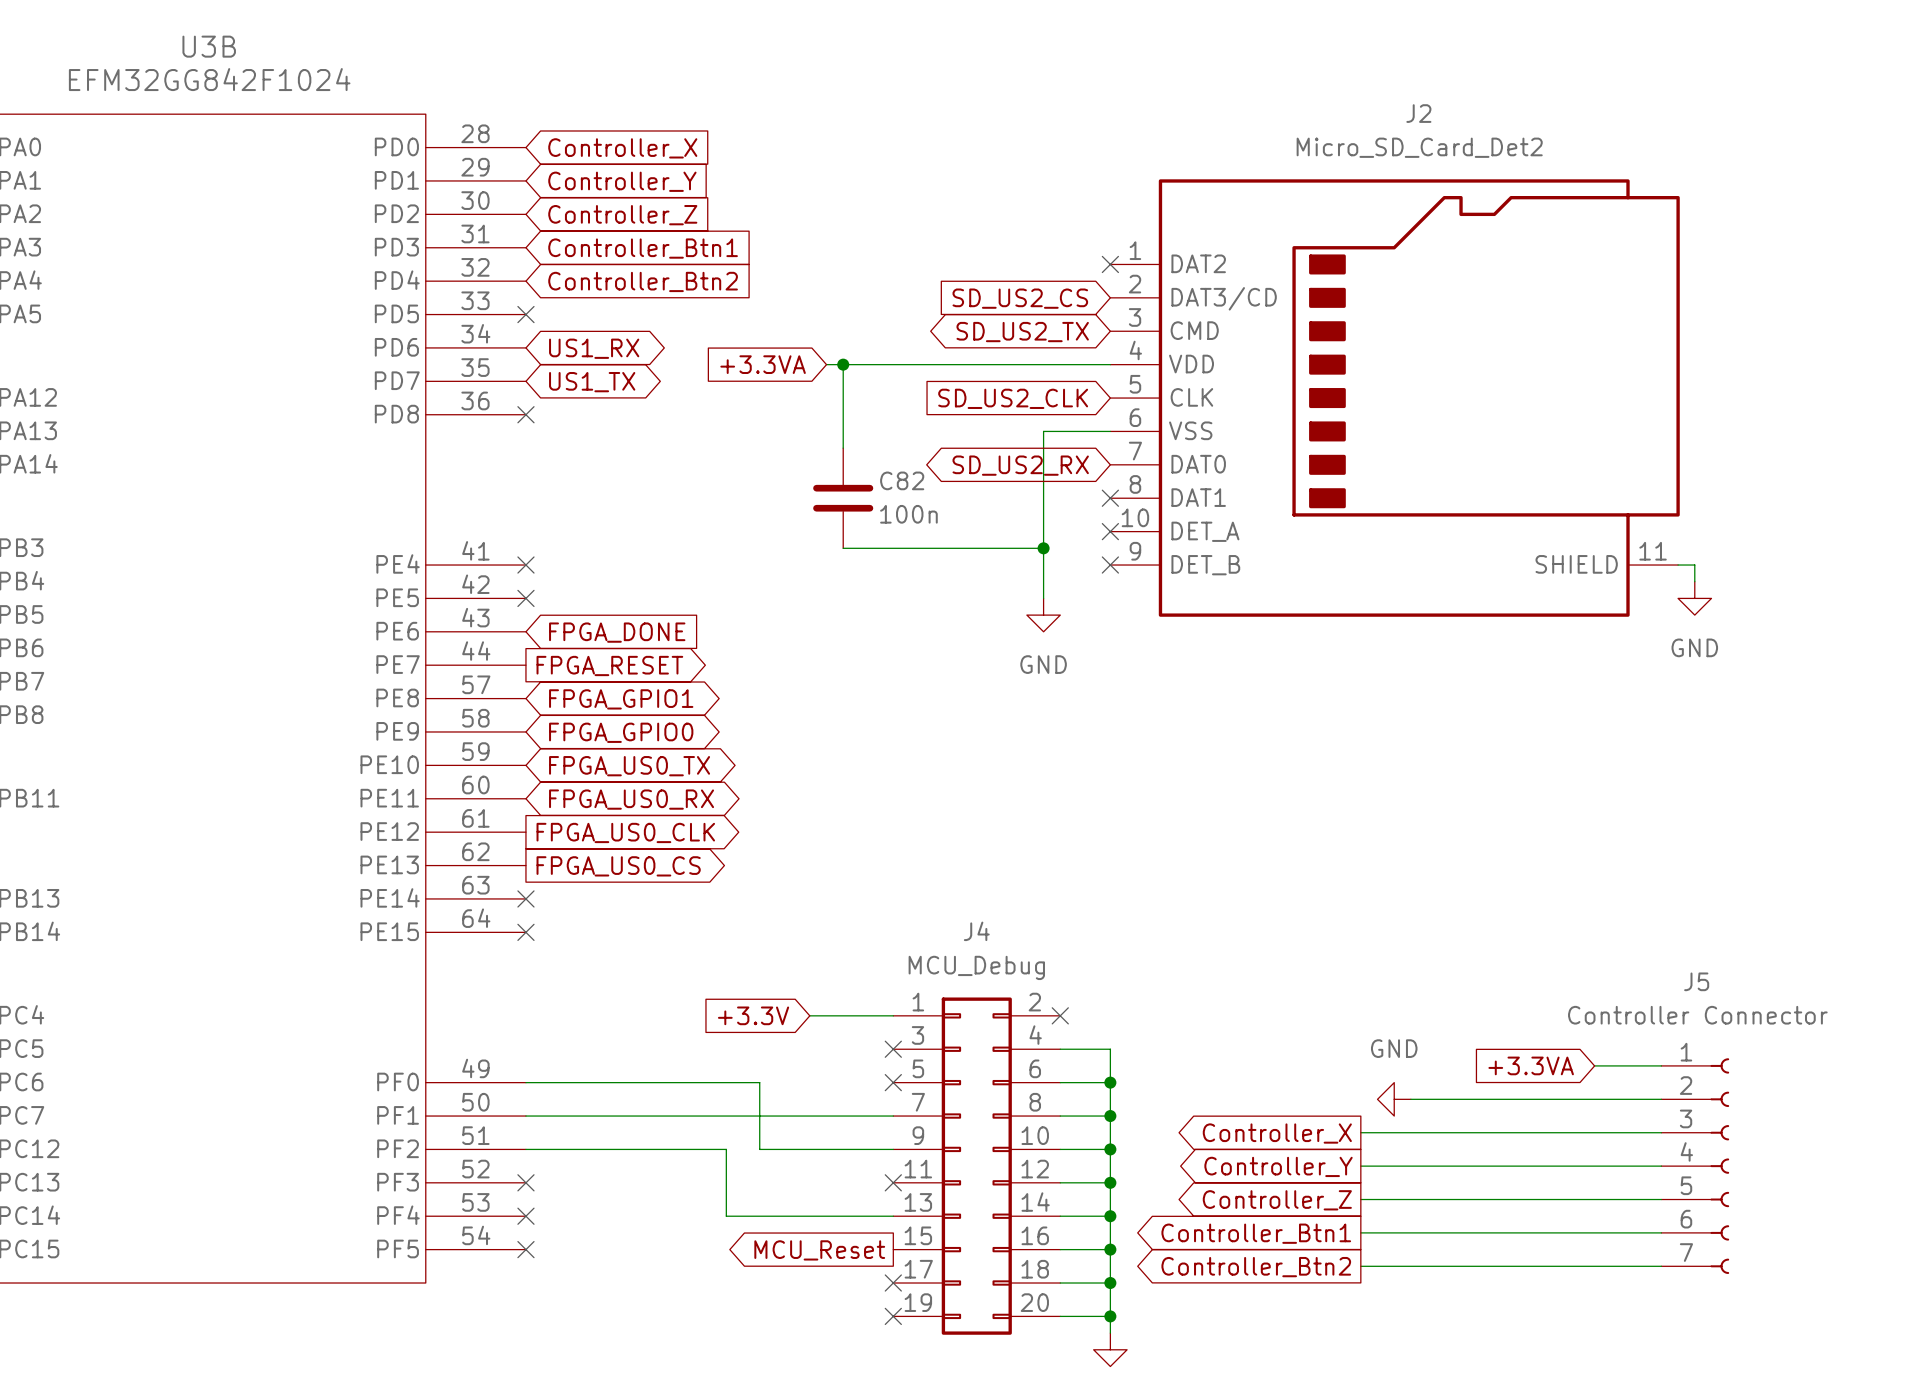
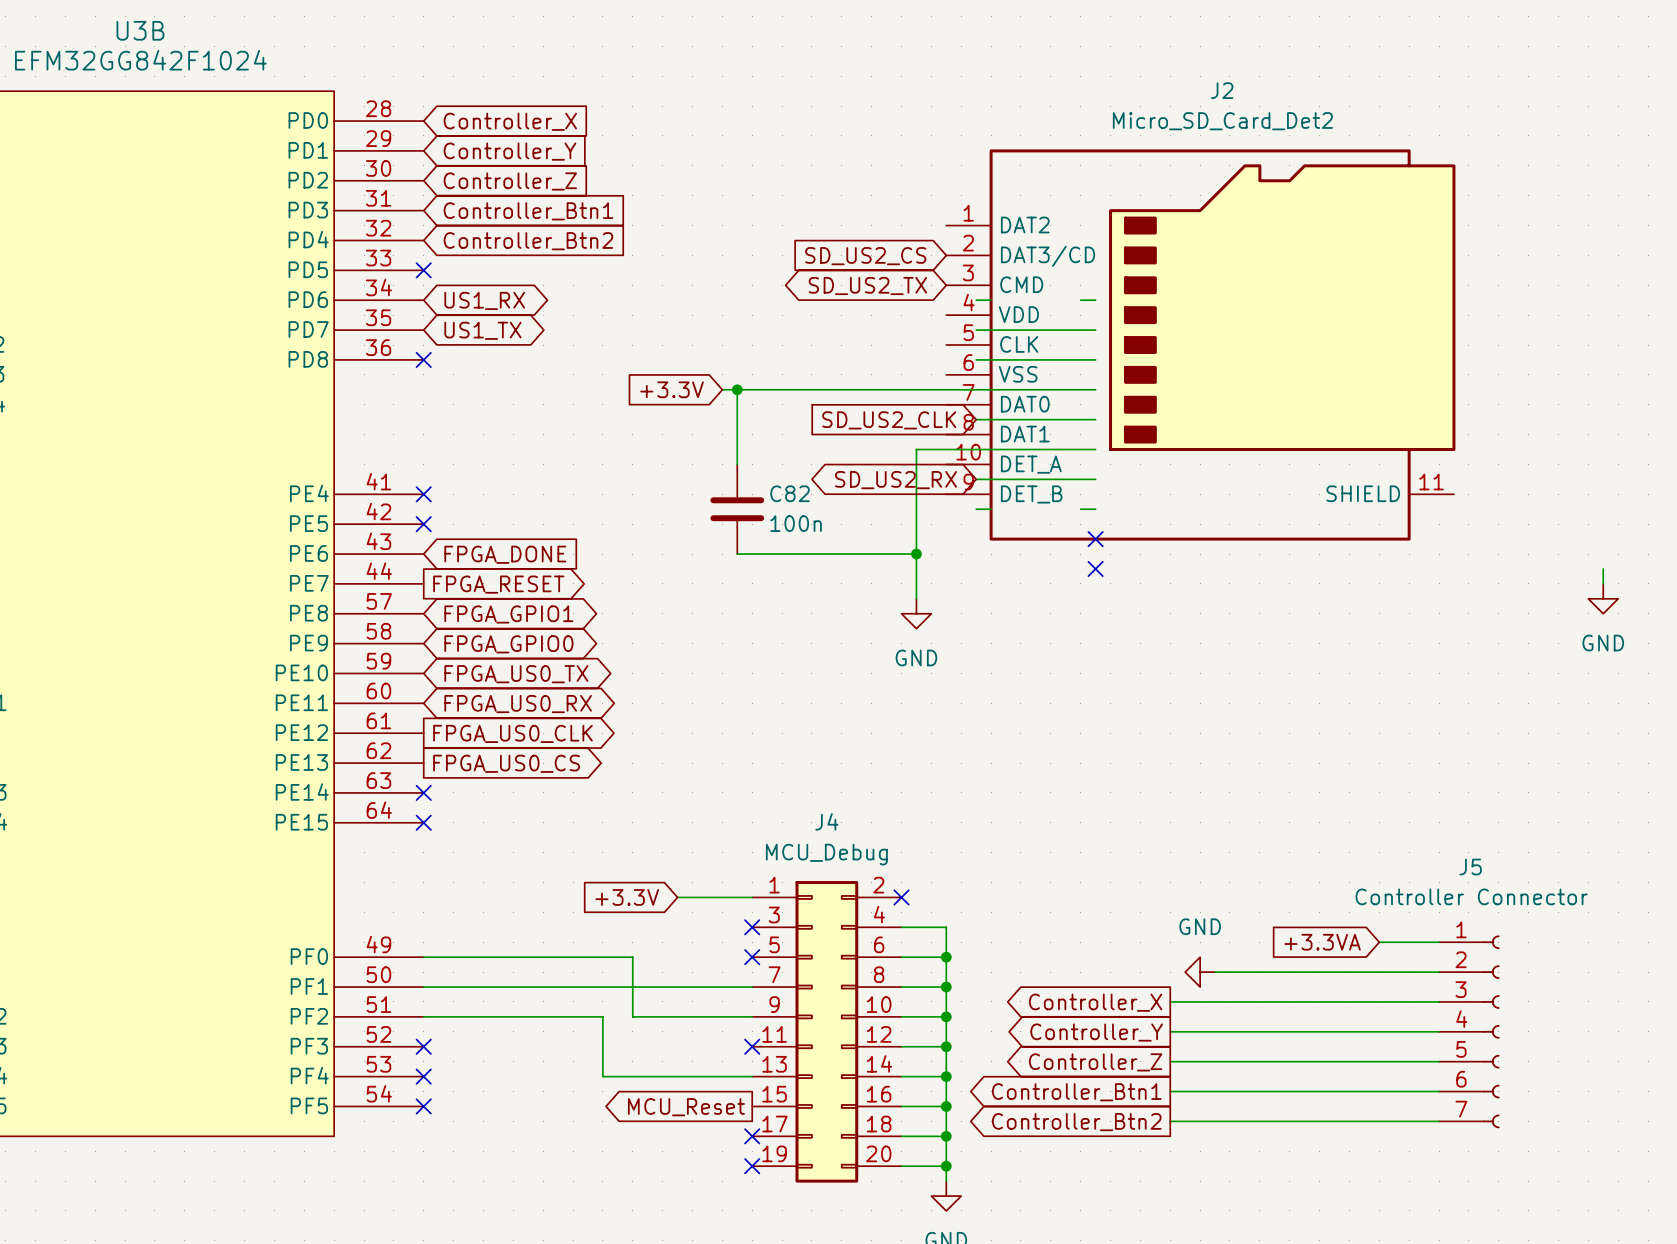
no-connect mark: (1110, 264) -> none
wire: none -> (976, 300) (991, 300)
wire: none -> (1080, 300) (1095, 300)
global label: +3.3VA (763, 364) -> none
wire: (826, 364) (1110, 364) -> none
wire: (843, 364) (843, 448) -> (737, 389) (737, 464)
junction: (843, 364) -> none
wire: none -> (976, 330) (1095, 330)
global label position: SD_US2_CLK (1013, 398) -> SD_US2_CLK (889, 420)
wire: none -> (976, 359) (1095, 359)
wire: (1110, 431) (1043, 431) (1043, 598) -> none
global label: none -> +3.3V (672, 389)
wire: none -> (722, 389) (1095, 389)
junction: none -> (737, 389)
global label position: SD_US2_RX (1020, 465) -> SD_US2_RX (895, 480)
wire: none -> (976, 419) (1095, 419)
C82 position: (843, 498) -> (737, 509)
no-connect mark: (1110, 498) -> none
wire: none -> (1095, 449) (916, 449) (916, 598)
no-connect mark: (1110, 531) -> none
wire: (843, 548) (1043, 548) -> (737, 554) (916, 554)
junction: (1043, 548) -> none
wire: none -> (976, 479) (1095, 479)
no-connect mark: (1110, 565) -> none
wire: (1678, 565) (1694, 565) (1694, 581) -> none
wire: none -> (976, 509) (991, 509)
wire: none -> (1080, 509) (1095, 509)
power symbol position: GND (1694, 598) -> GND (1603, 598)
power symbol position: GND (1043, 615) -> GND (916, 613)
no-connect mark: none -> (1095, 539)
junction: none -> (916, 554)
no-connect mark: none -> (1095, 568)
wire: none -> (1603, 568) (1603, 583)

